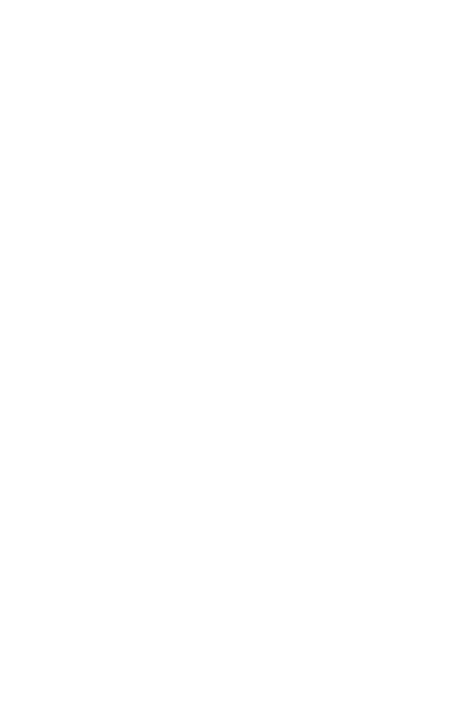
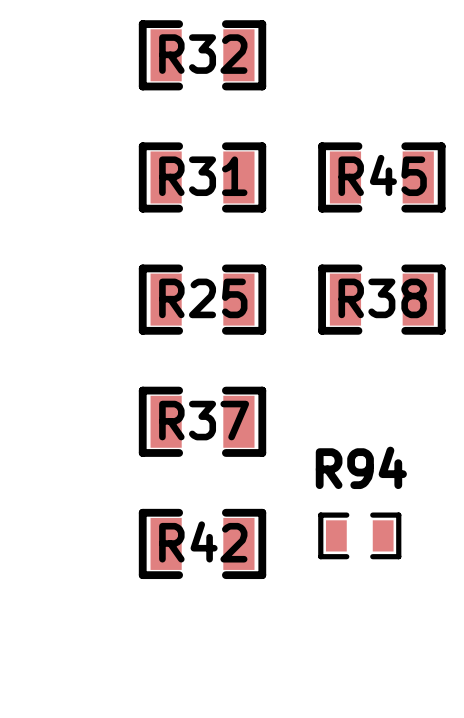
R32: none -> (202, 55)
R31: none -> (202, 177)
R45: none -> (381, 177)
R25: none -> (202, 299)
R38: none -> (381, 299)
R37: none -> (202, 421)
R94: none -> (359, 535)
R42: none -> (202, 543)

